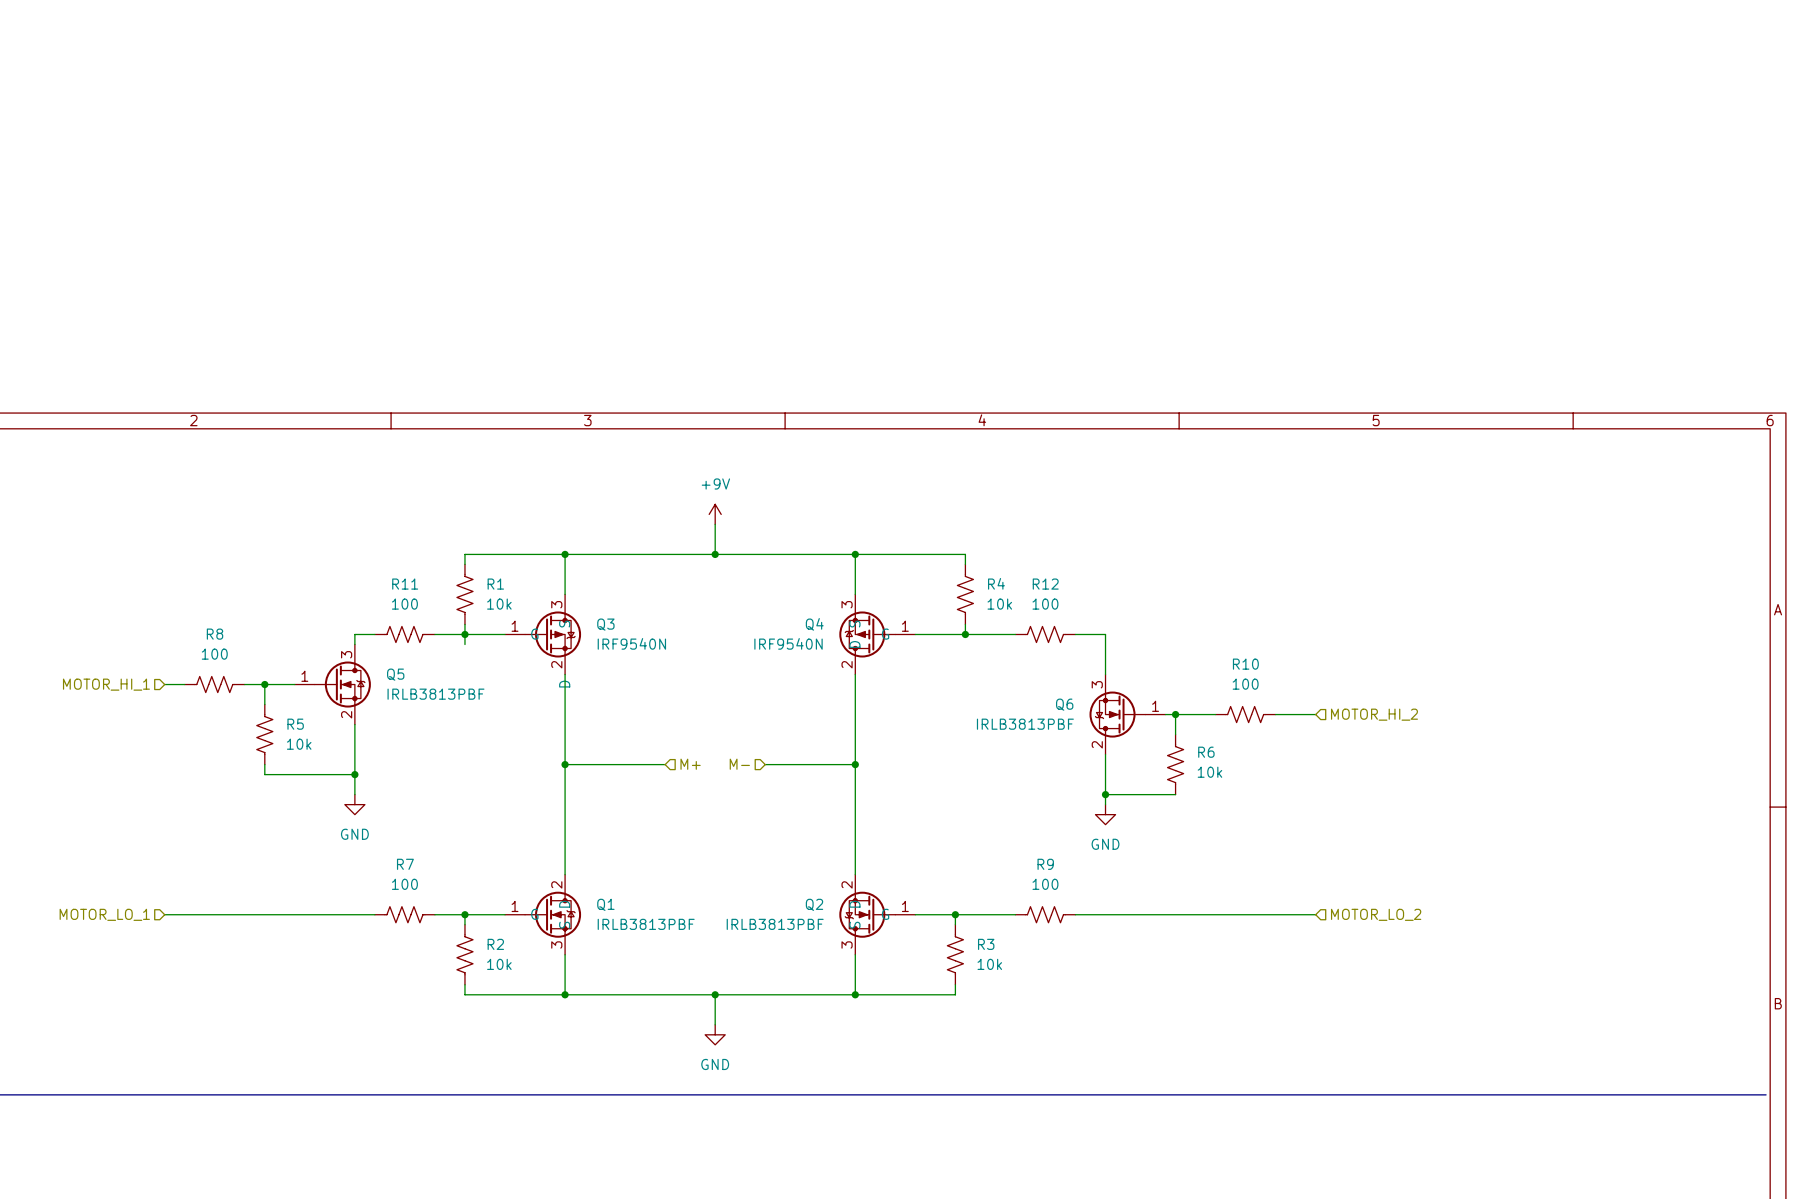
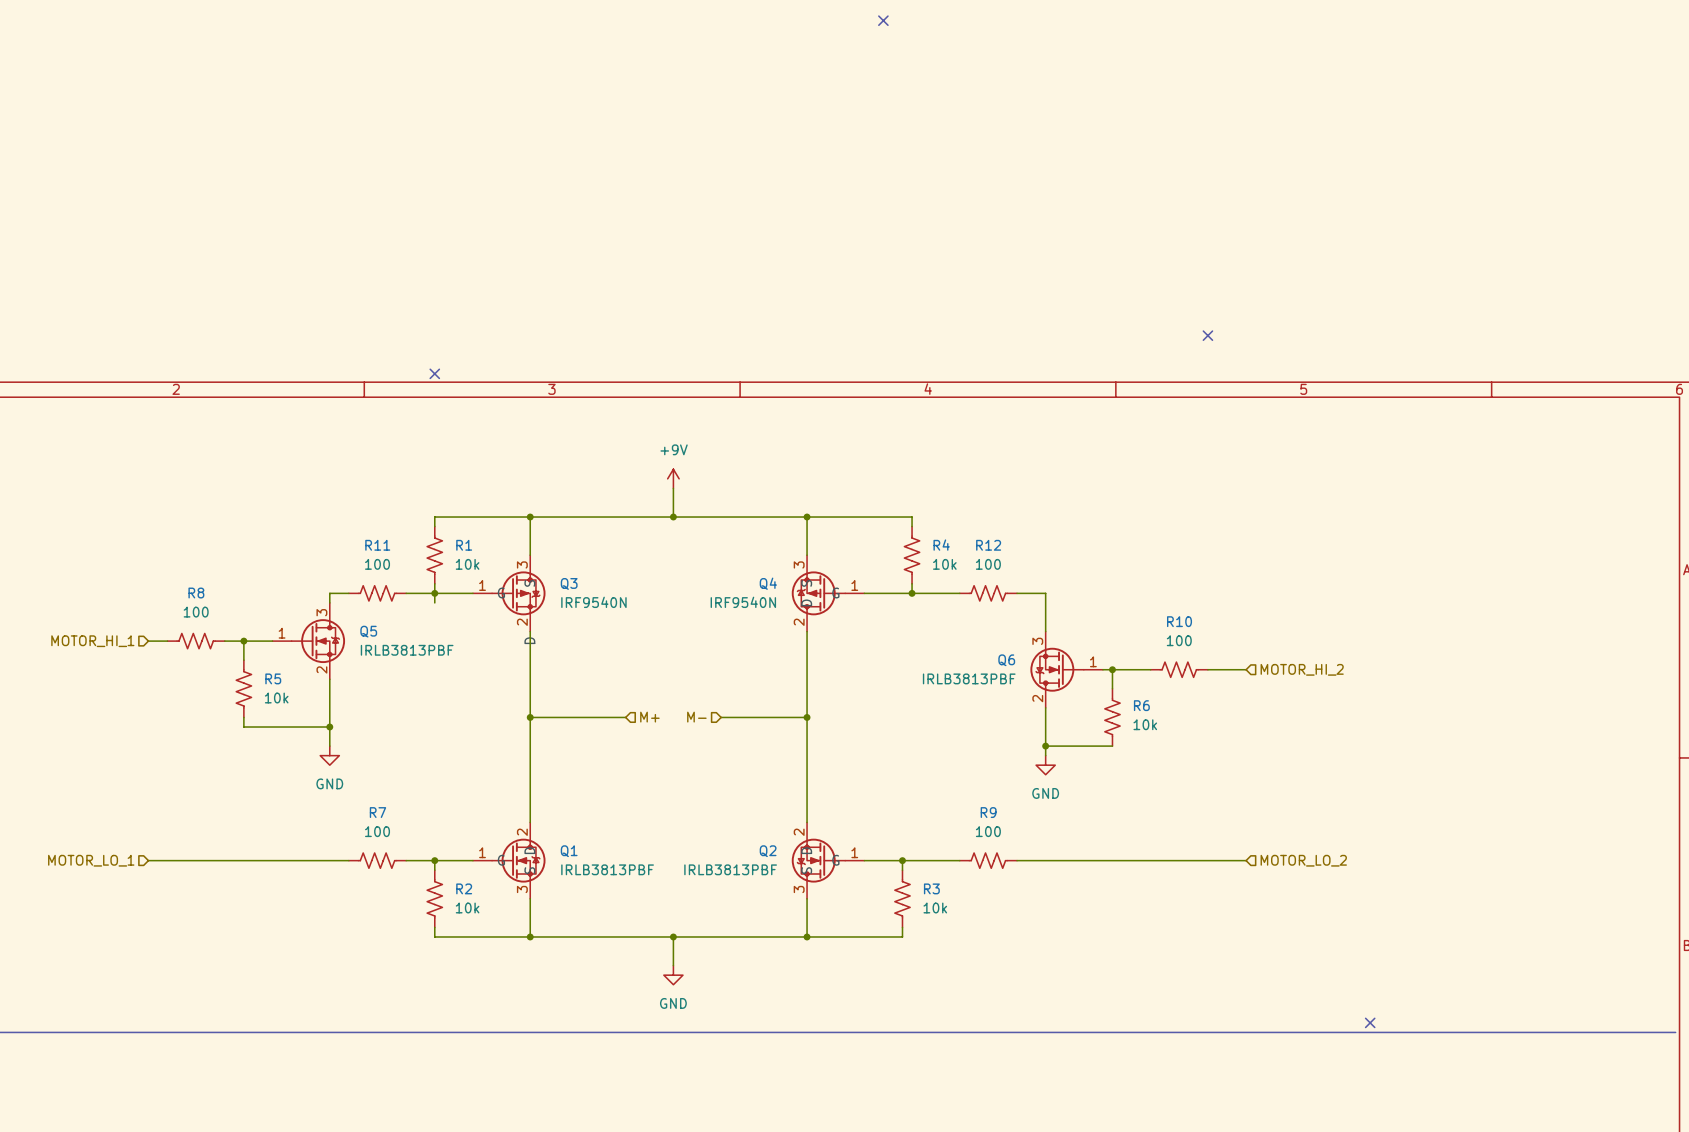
no-connect mark: none -> (883, 20)
no-connect mark: none -> (1207, 335)
no-connect mark: none -> (434, 373)
no-connect mark: none -> (1370, 1022)

